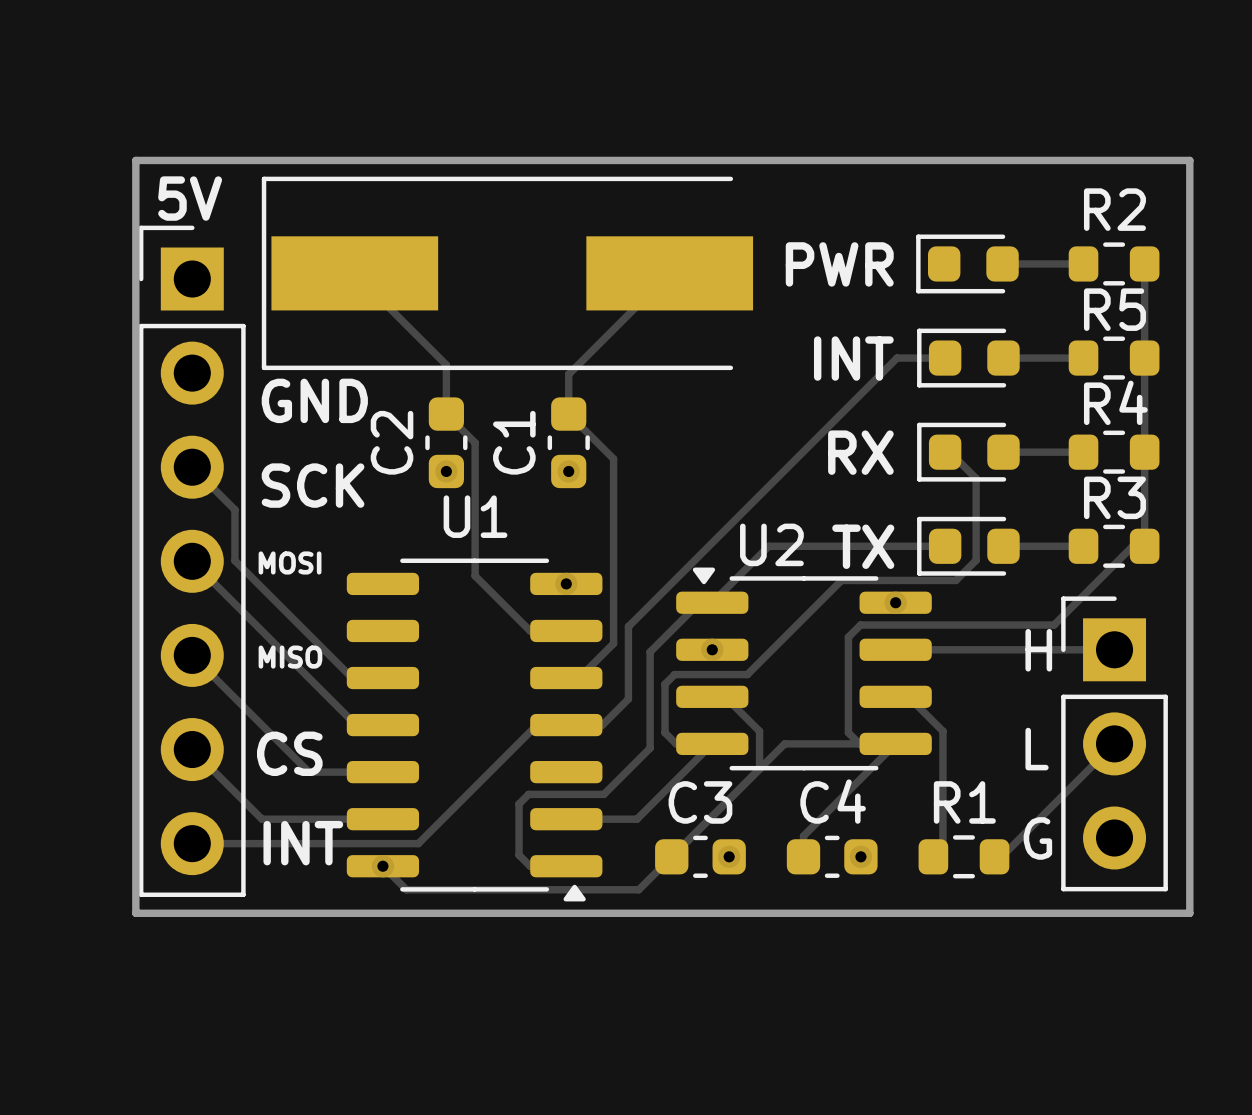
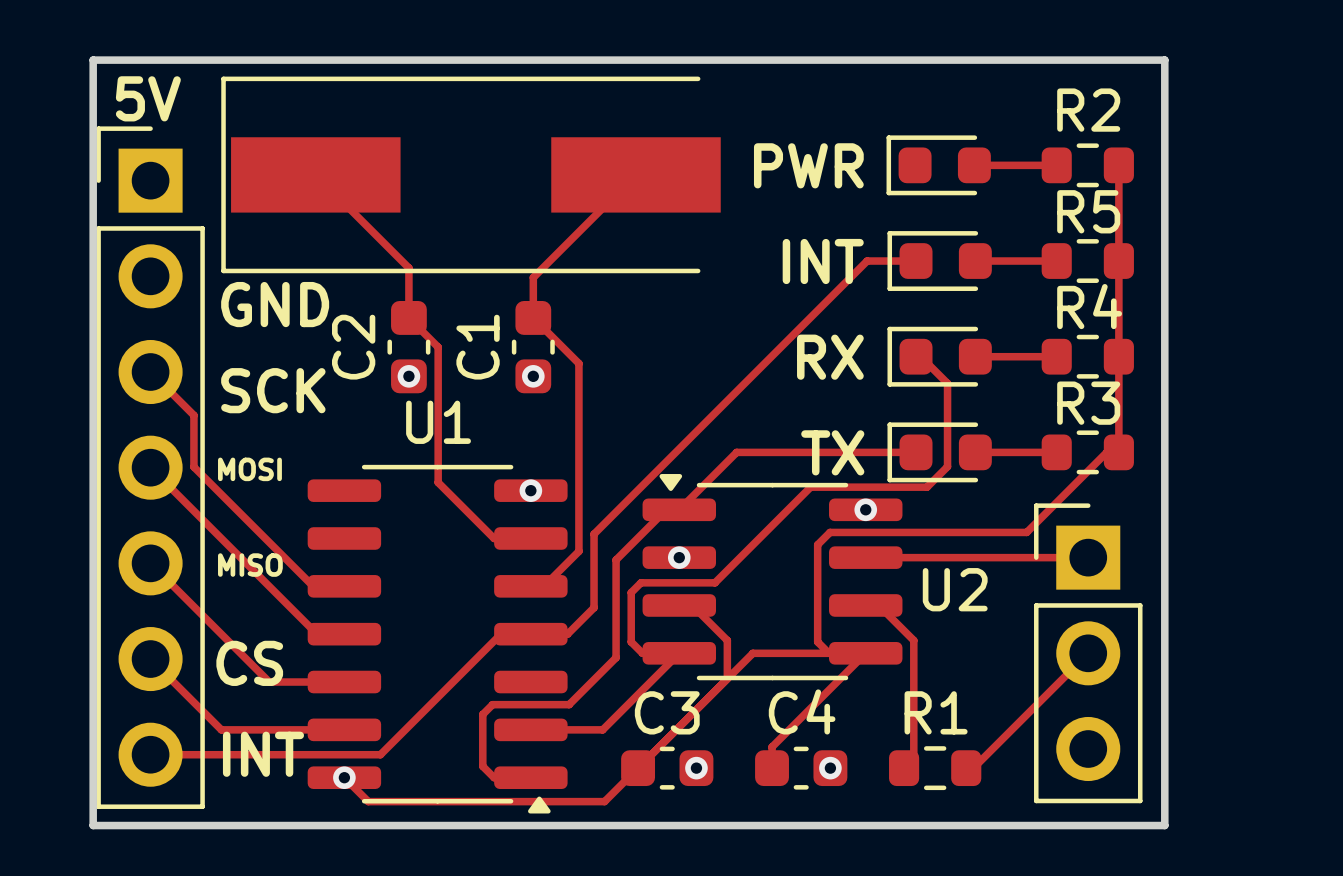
U2 name position: U2 (771, 544) -> U2 (955, 589)
text: H (1038, 650) -> none
text: L (1037, 749) -> none
text: G (1037, 838) -> none

